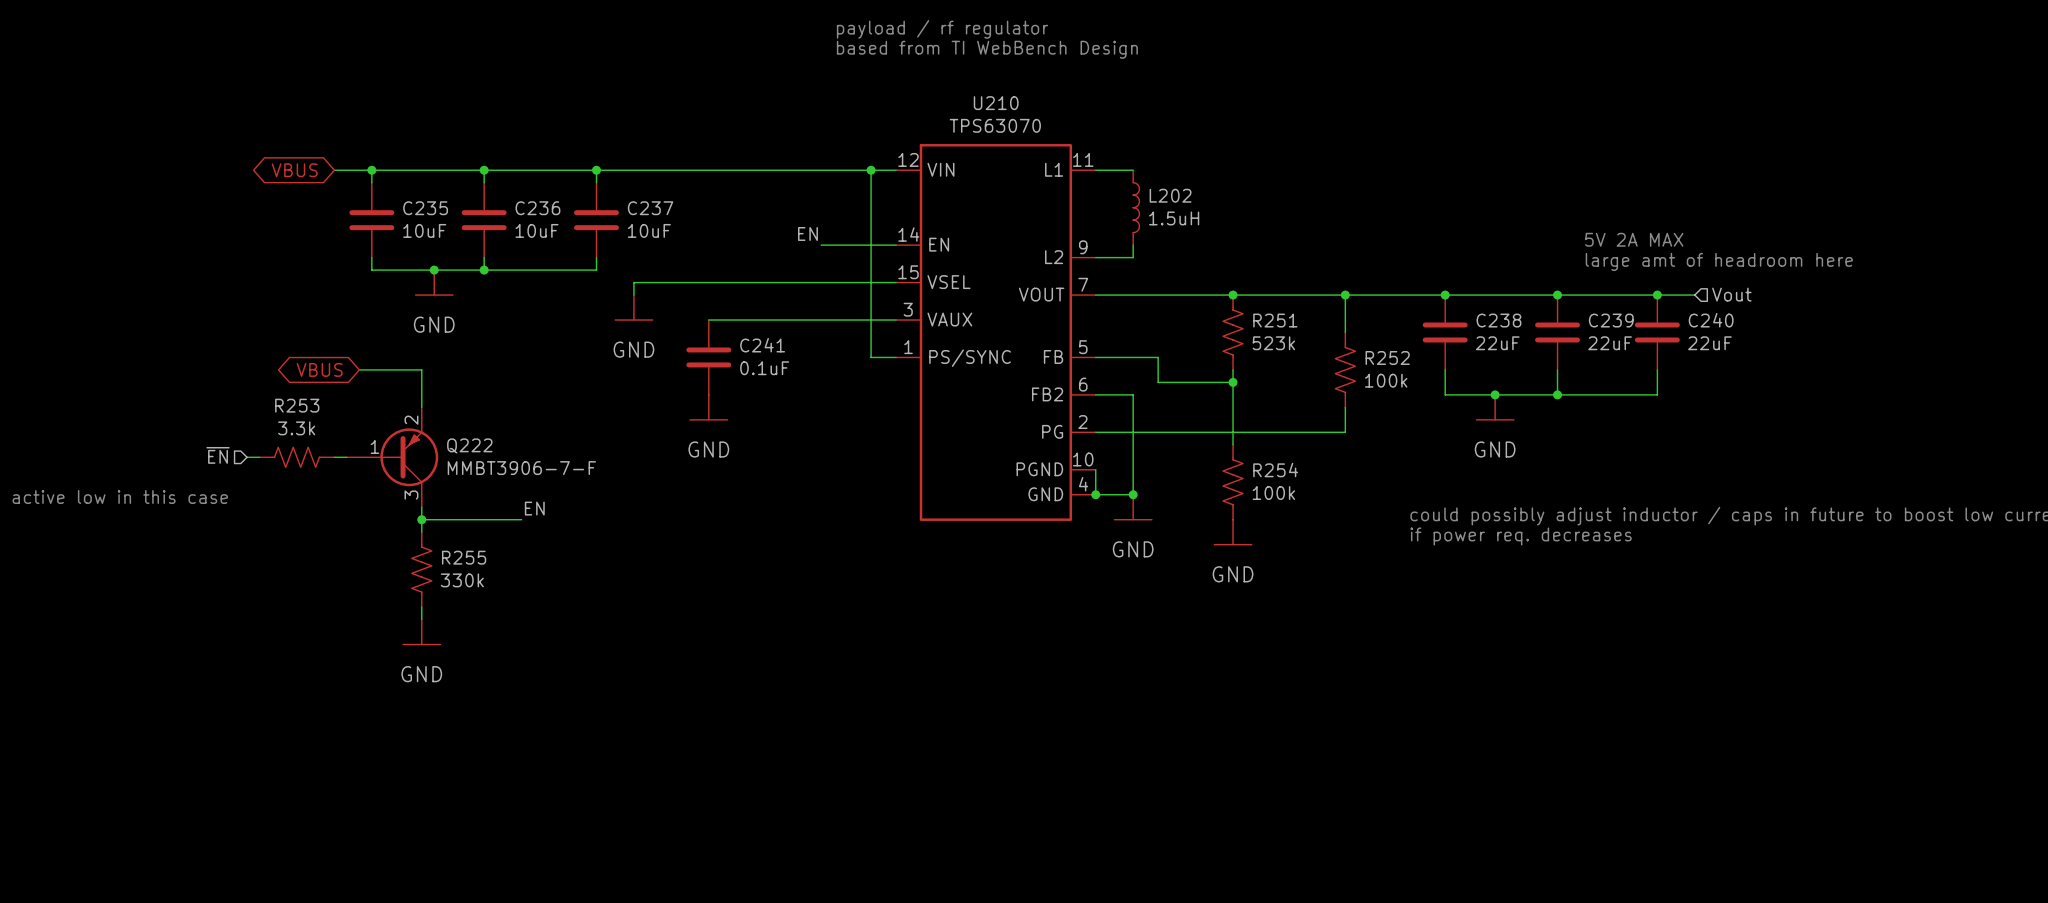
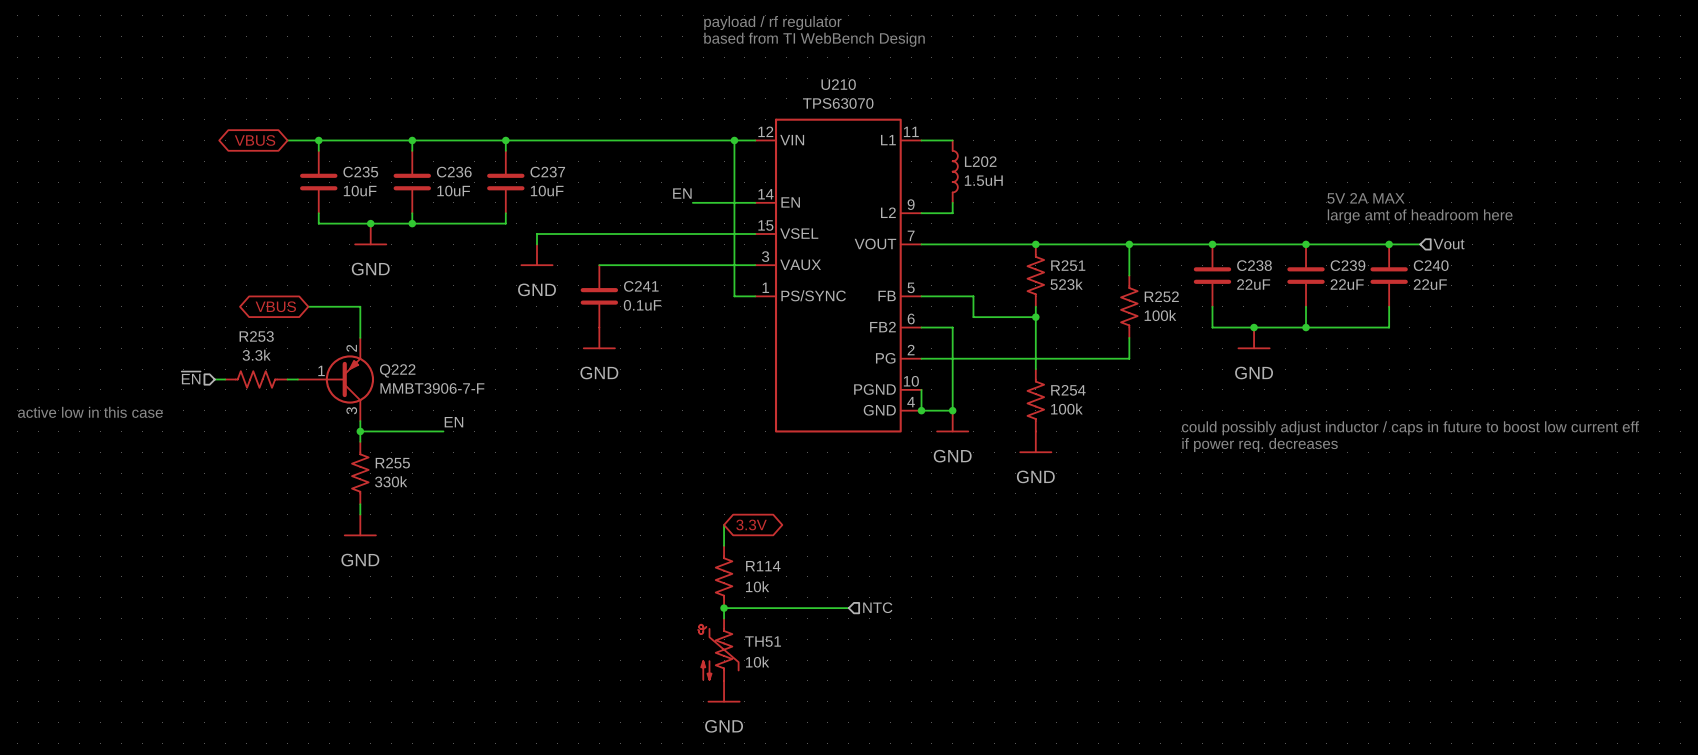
wire: none -> (724, 524) (724, 545)
global label: none -> 3.3V (751, 524)
R114: none -> 10k (724, 576)
junction: none -> (724, 608)
wire: none -> (848, 608) (724, 608) (724, 618)
hierarchical label: none -> NTC (877, 607)
TH51: none -> 10k (718, 649)
power symbol: none -> GND (724, 691)

